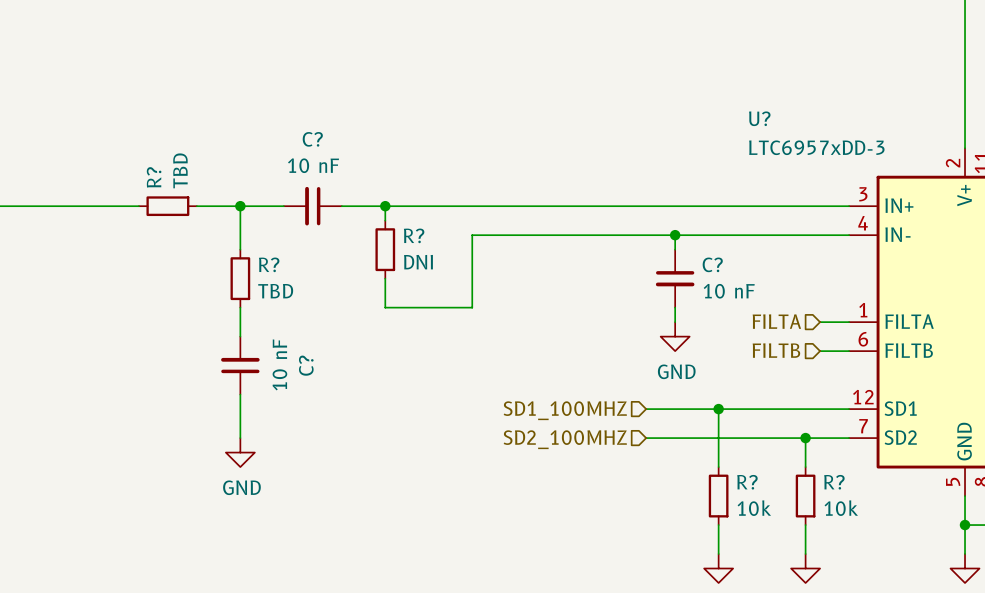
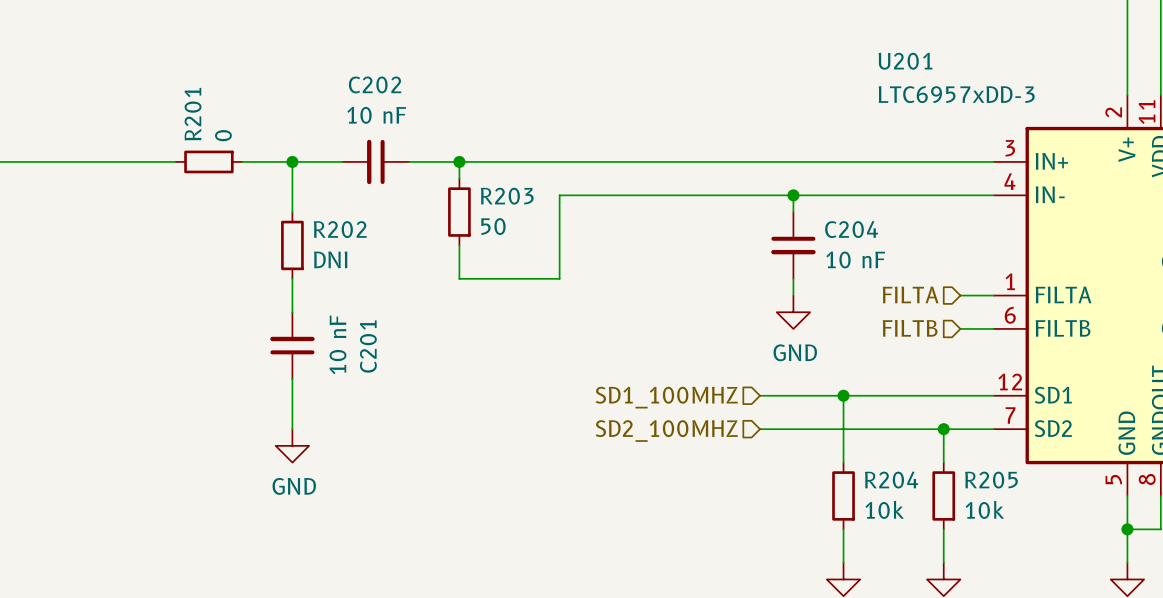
U? name: U? (759, 118) -> U201 (905, 61)
C? name: C? (312, 139) -> C202 (375, 84)
R? value: TBD (180, 170) -> 0 (223, 135)
R? name: R? (154, 177) -> R201 (193, 114)
R? name: R? (414, 235) -> R203 (507, 196)
R? value: DNI (418, 262) -> 50 (493, 226)
R? name: R? (269, 264) -> R202 (340, 229)
C? name: C? (712, 264) -> C204 (851, 229)
R? value: TBD (275, 291) -> DNI (330, 259)
C? name: C? (306, 365) -> C201 (368, 346)
R? name: R? (747, 482) -> R204 (891, 480)
R? name: R? (834, 482) -> R205 (991, 480)

